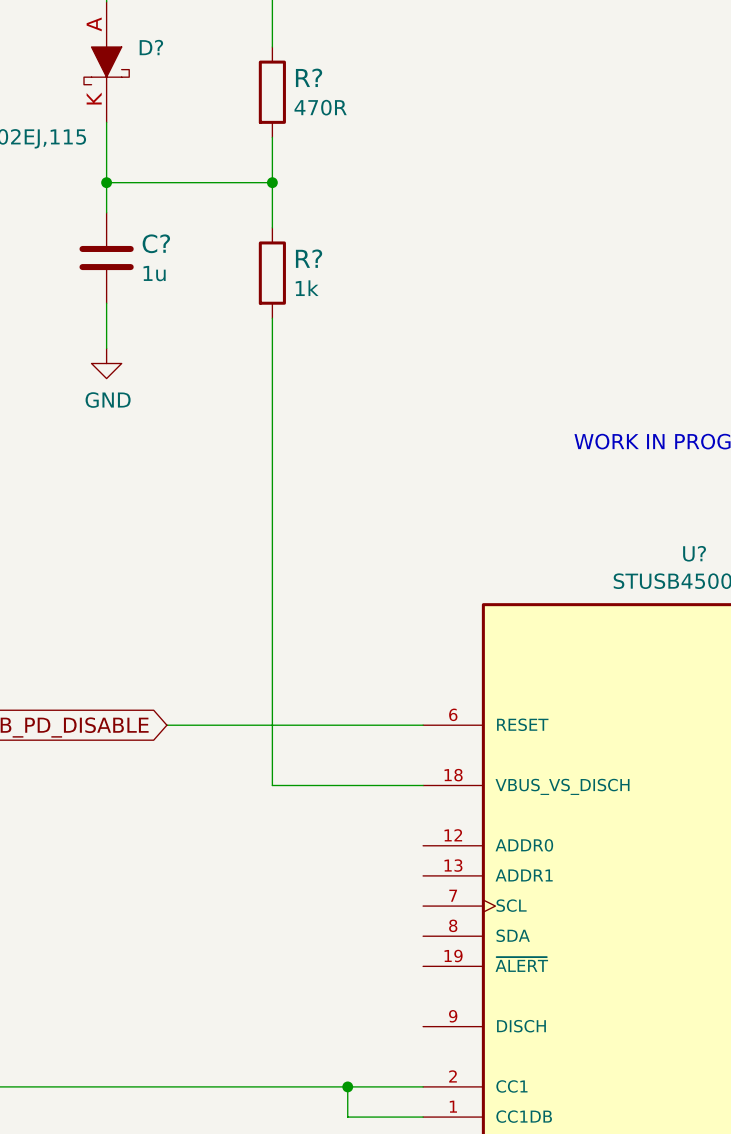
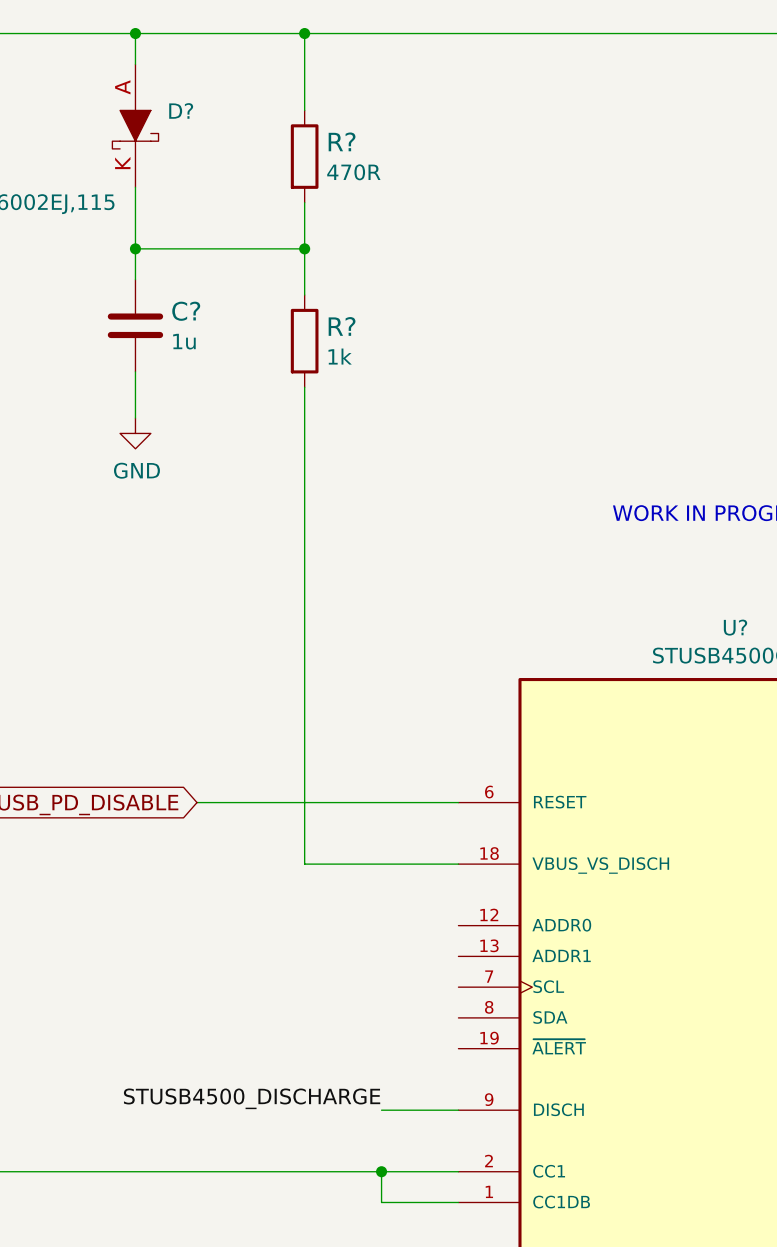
label: none -> STUSB4500_DISCHARGE (252, 1098)
wire: none -> (381, 1110) (458, 1110)

